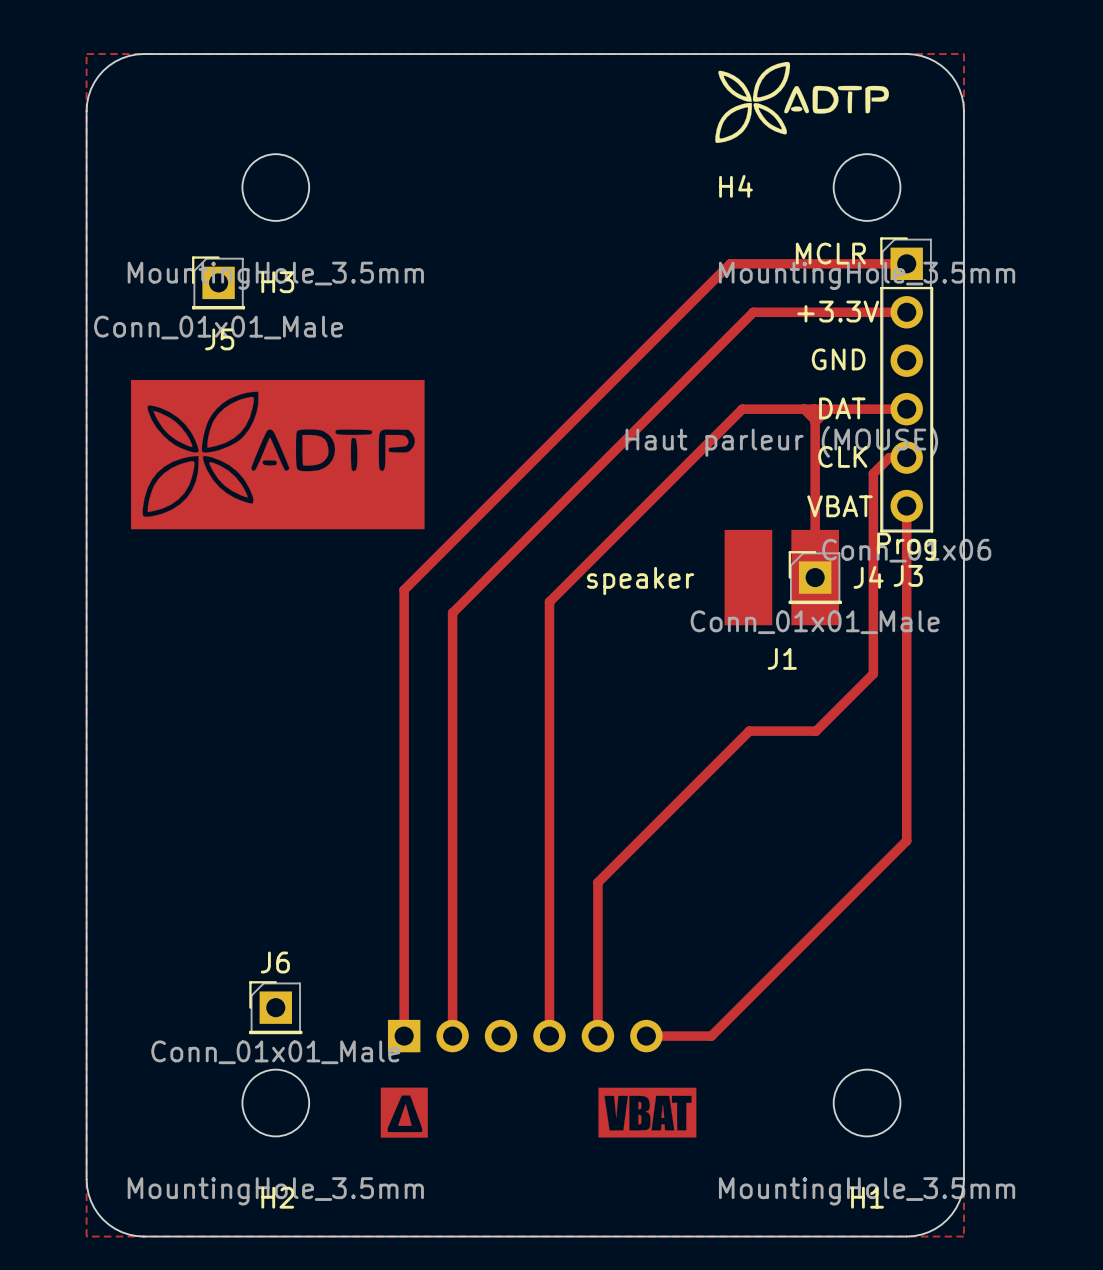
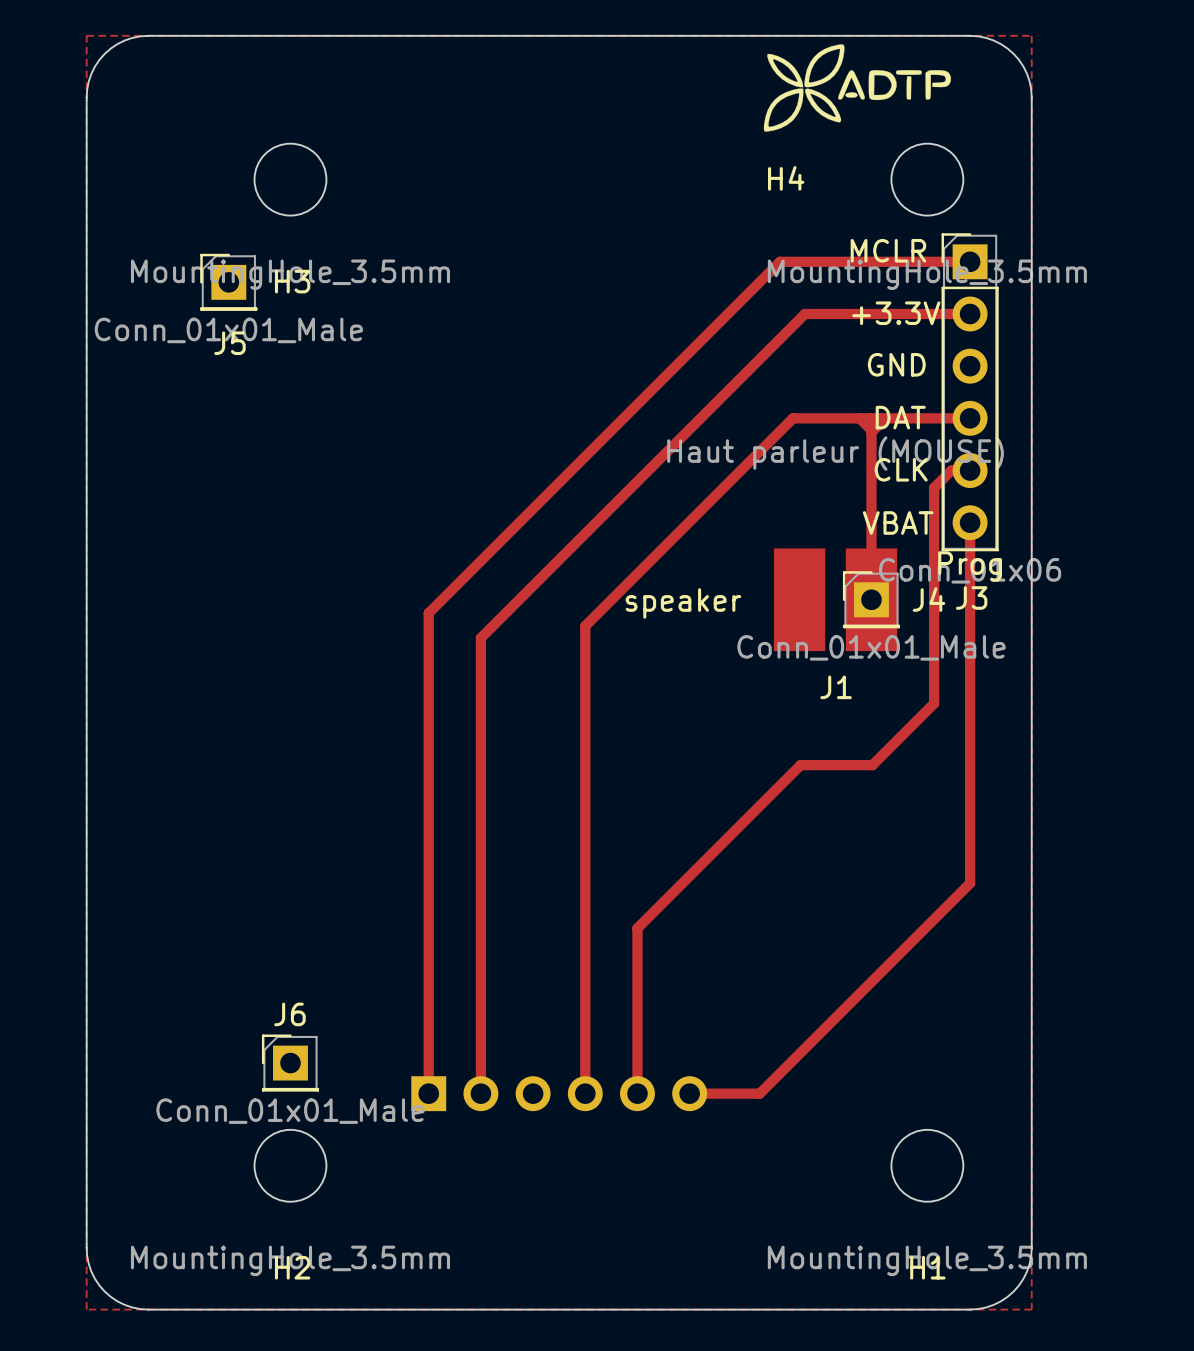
drawing: [130, 379, 425, 530] -> none
drawing: [380, 1087, 428, 1138] -> none
drawing: [598, 1087, 697, 1138] -> none

